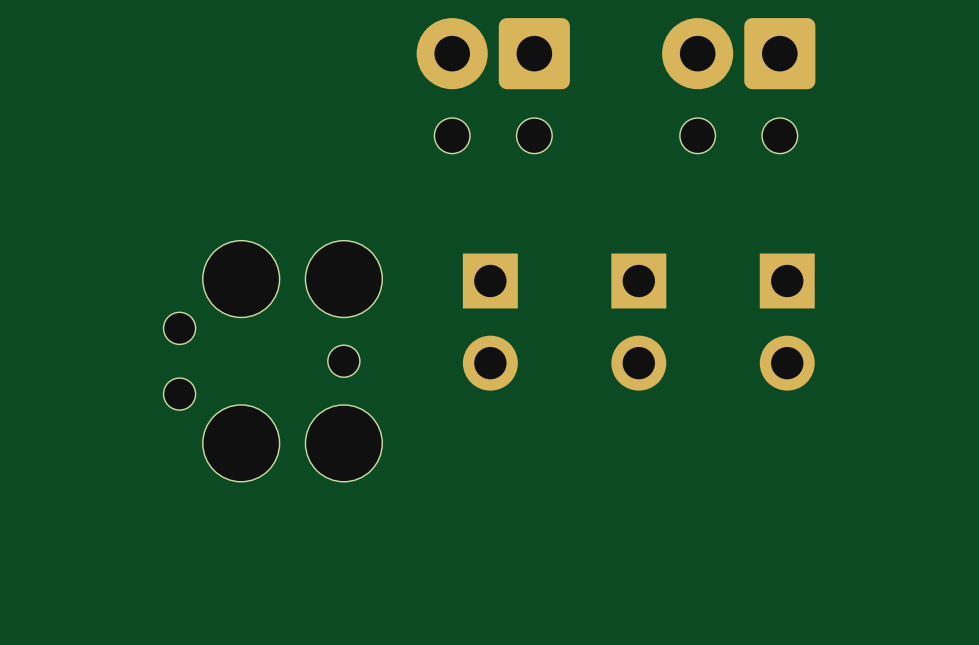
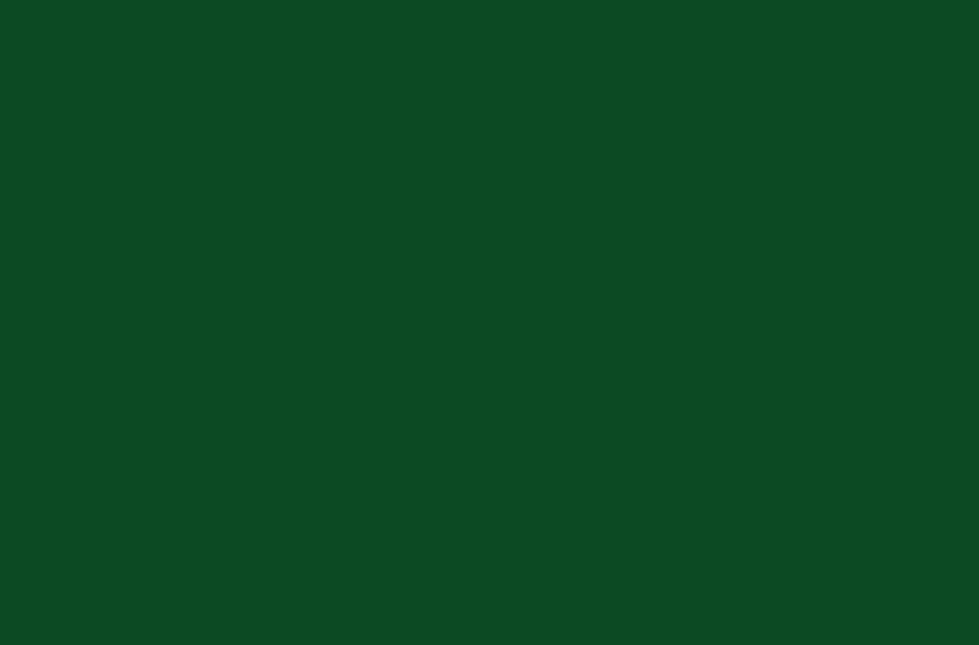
part: (493, 85) -> none
part: (738, 85) -> none
part: (490, 322) -> none
part: (638, 322) -> none
part: (787, 322) -> none
part: (272, 361) -> none

